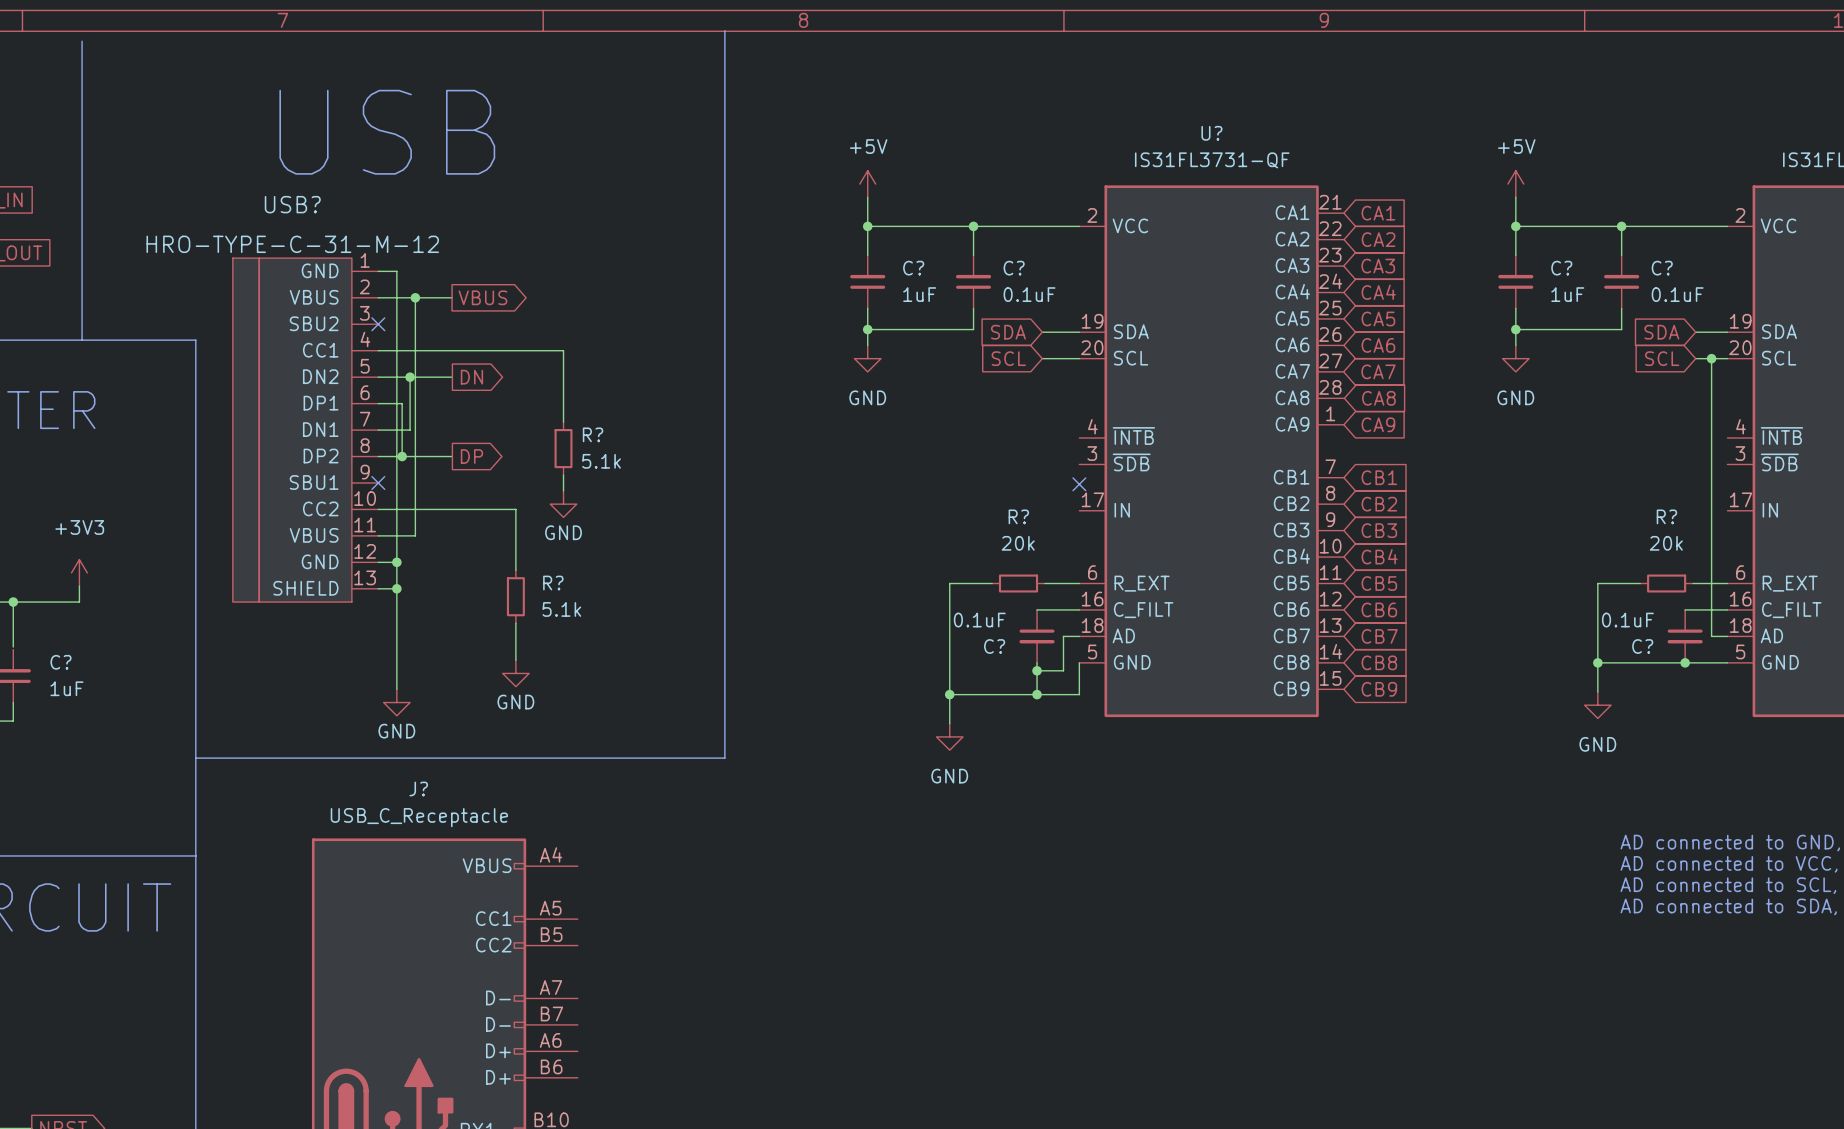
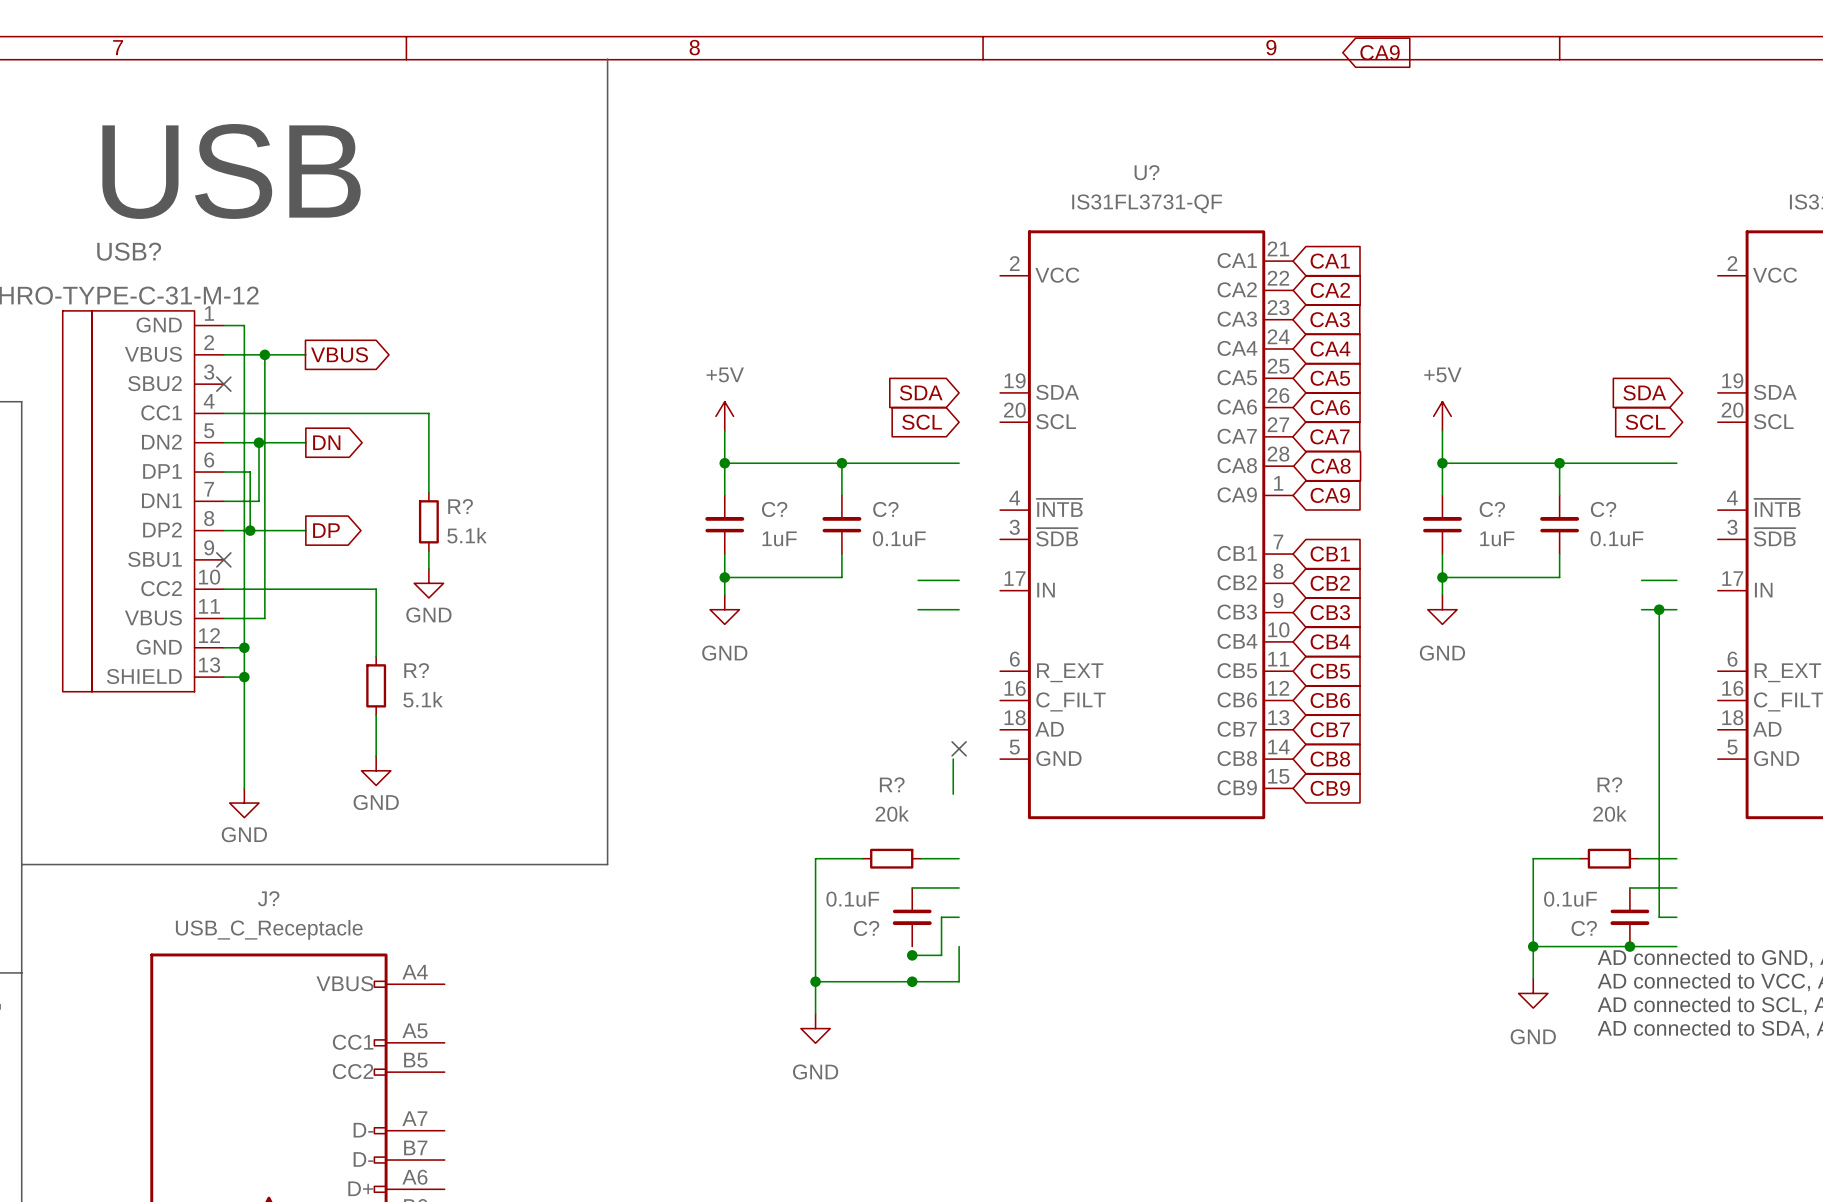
global label: none -> CA9 (1380, 52)
power symbol position: +5V (867, 184) -> +5V (724, 416)
power symbol position: +5V (1515, 184) -> +5V (1442, 416)
wire: (867, 197) (867, 255) -> (724, 431) (724, 495)
wire: (1515, 197) (1515, 255) -> (1442, 431) (1442, 495)
wire: (867, 226) (1079, 226) -> (724, 463) (959, 463)
junction: (867, 226) -> none
wire: (973, 226) (973, 255) -> (841, 463) (841, 495)
junction: (973, 226) -> none
wire: (1515, 226) (1727, 226) -> (1442, 463) (1676, 463)
junction: (1515, 226) -> none
wire: (1621, 226) (1621, 255) -> (1559, 463) (1559, 495)
junction: (1621, 226) -> none
C? position: (867, 281) -> (724, 524)
C?: 0.1uF (973, 281) -> none
C? position: (1515, 281) -> (1442, 524)
C?: 0.1uF (1621, 281) -> none
wire: (867, 308) (867, 345) -> (724, 554) (724, 595)
wire: (973, 308) (973, 329) (867, 329) -> (841, 554) (841, 577) (724, 577)
wire: (1515, 308) (1515, 345) -> (1442, 554) (1442, 595)
wire: (1621, 308) (1621, 329) (1515, 329) -> (1559, 554) (1559, 577) (1442, 577)
junction: (867, 329) -> none
junction: (1515, 329) -> none
wire: (1042, 332) (1079, 332) -> (918, 580) (959, 580)
wire: (1695, 332) (1727, 332) -> (1641, 580) (1676, 580)
power symbol: GND (867, 358) -> none
wire: (1042, 358) (1079, 358) -> (918, 609) (959, 609)
power symbol: GND (1515, 358) -> none
wire: (1695, 358) (1727, 358) -> (1641, 609) (1676, 609)
wire: (1711, 358) (1711, 636) (1727, 636) -> (1659, 609) (1659, 917) (1676, 917)
junction: (1711, 358) -> none
junction: none -> (724, 463)
junction: none -> (841, 463)
junction: none -> (1442, 463)
junction: none -> (1559, 463)
C?: none -> 0.1uF (841, 524)
C?: none -> 0.1uF (1559, 524)
no-connect mark: (1079, 484) -> none
junction: none -> (724, 577)
junction: none -> (1442, 577)
power symbol: none -> GND (724, 609)
power symbol: none -> GND (1442, 609)
junction: none -> (1659, 609)
wire: (992, 583) (949, 583) (949, 723) -> (862, 858) (815, 858) (815, 1013)
R? position: (1018, 583) -> (891, 858)
wire: (1044, 583) (1079, 583) -> (921, 858) (959, 858)
wire: (1640, 583) (1597, 583) (1597, 691) -> (1580, 858) (1533, 858) (1533, 978)
R? position: (1666, 583) -> (1609, 858)
wire: (1693, 583) (1727, 583) -> (1638, 858) (1676, 858)
wire: (1037, 609) (1079, 609) -> (912, 887) (959, 887)
wire: (1685, 609) (1727, 609) -> (1629, 887) (1676, 887)
C?: 0.1uF (1037, 636) -> none
wire: (1079, 636) (1063, 636) (1063, 670) (1037, 670) -> (959, 917) (941, 917) (941, 955) (912, 955)
C?: 0.1uF (1685, 636) -> none
no-connect mark: none -> (959, 748)
wire: (1079, 662) (1079, 694) (949, 694) -> (959, 946) (959, 981) (815, 981)
wire: (1597, 662) (1727, 662) -> (1533, 946) (1676, 946)
junction: (1597, 662) -> none
junction: (1685, 662) -> none
junction: (1037, 670) -> none
junction: (949, 694) -> none
junction: (1037, 694) -> none
power symbol: GND (1597, 705) -> none
power symbol: GND (949, 736) -> none
C?: none -> 0.1uF (912, 917)
C?: none -> 0.1uF (1629, 917)
junction: none -> (1533, 946)
junction: none -> (1629, 946)
junction: none -> (912, 955)
junction: none -> (815, 981)
junction: none -> (912, 981)
power symbol: none -> GND (1533, 993)
power symbol: none -> GND (815, 1028)

